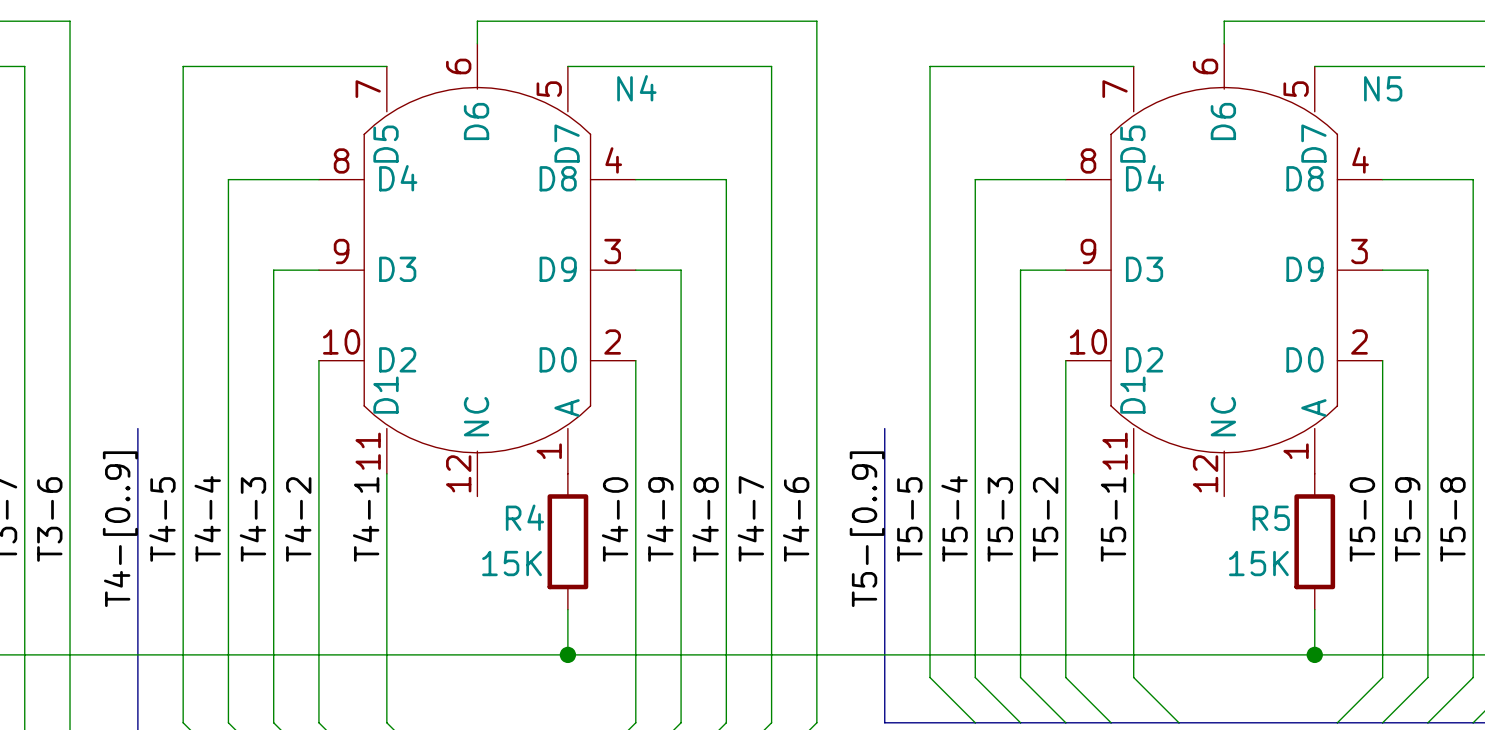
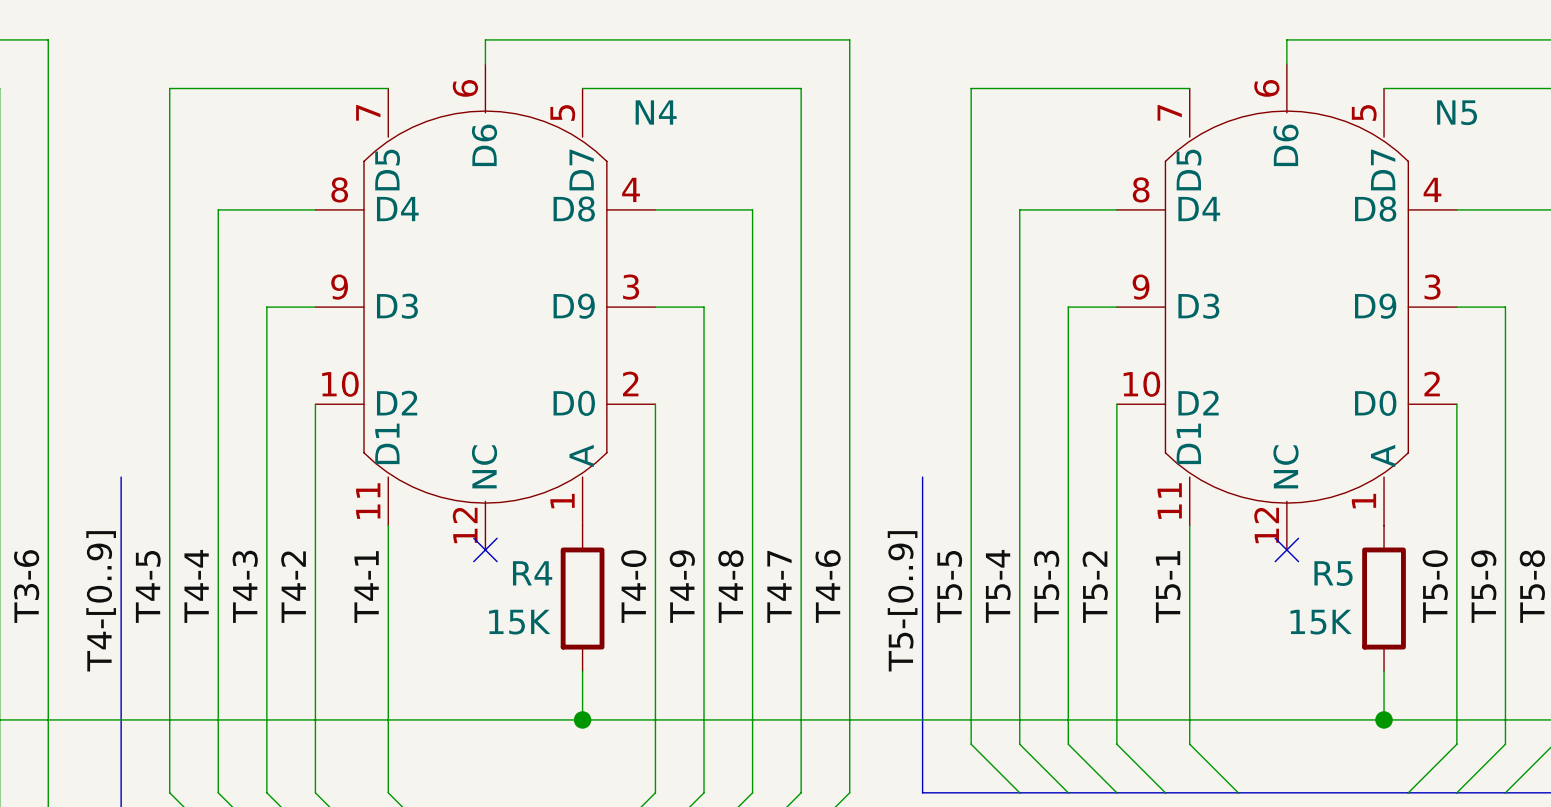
no-connect mark: none -> (485, 549)
no-connect mark: none -> (1286, 549)

